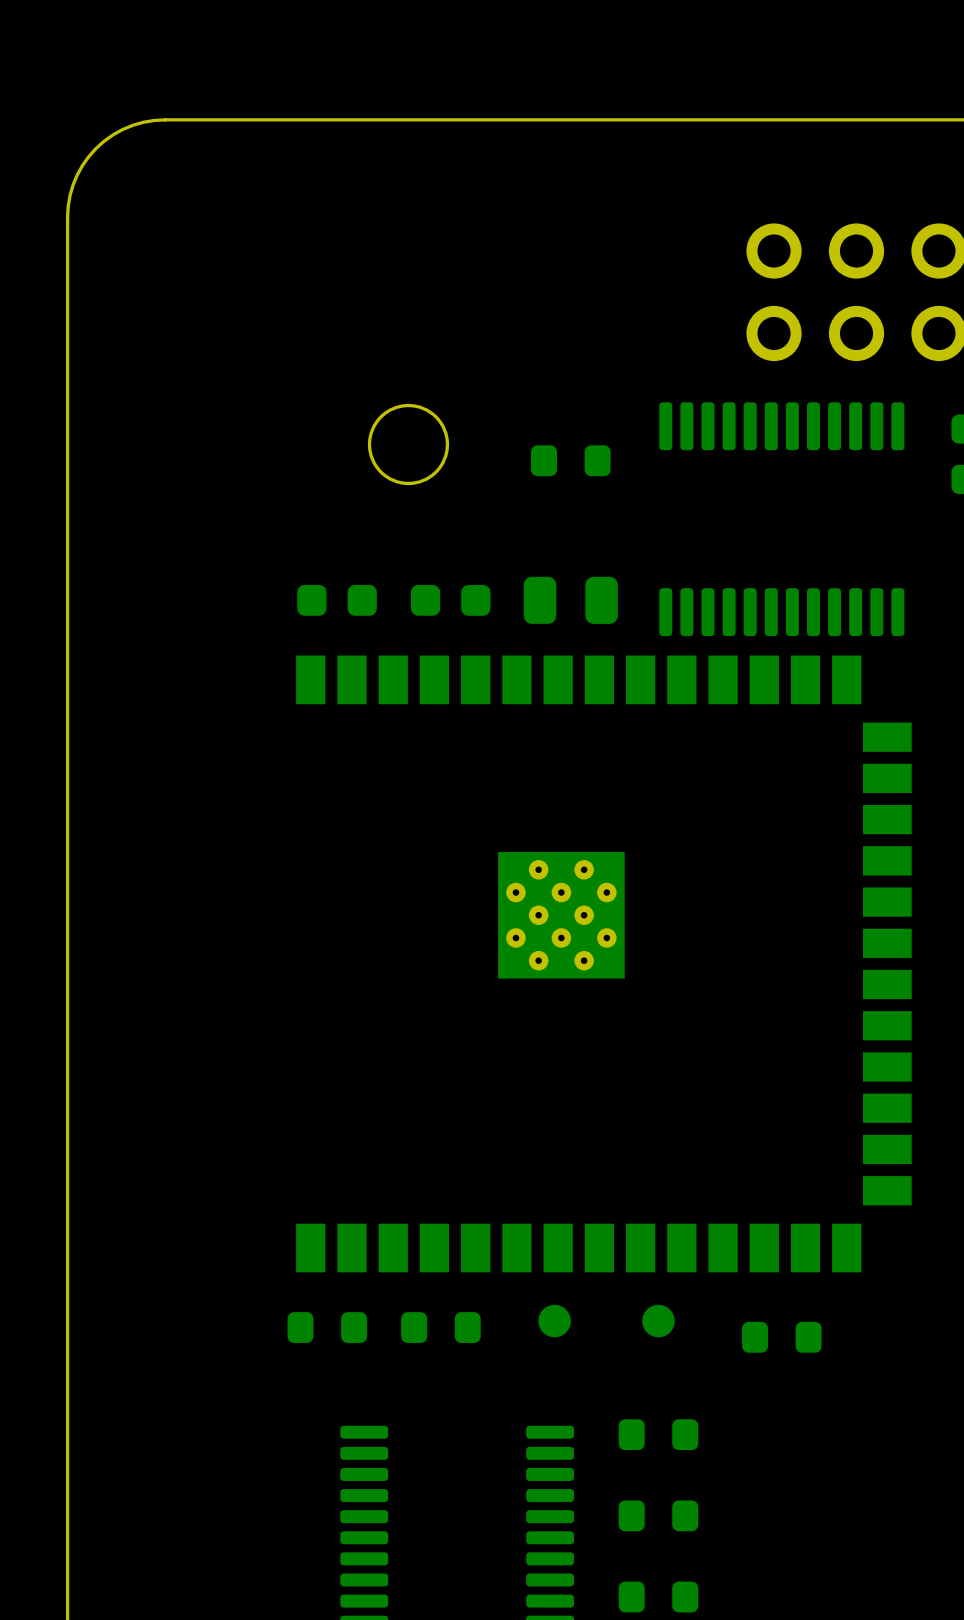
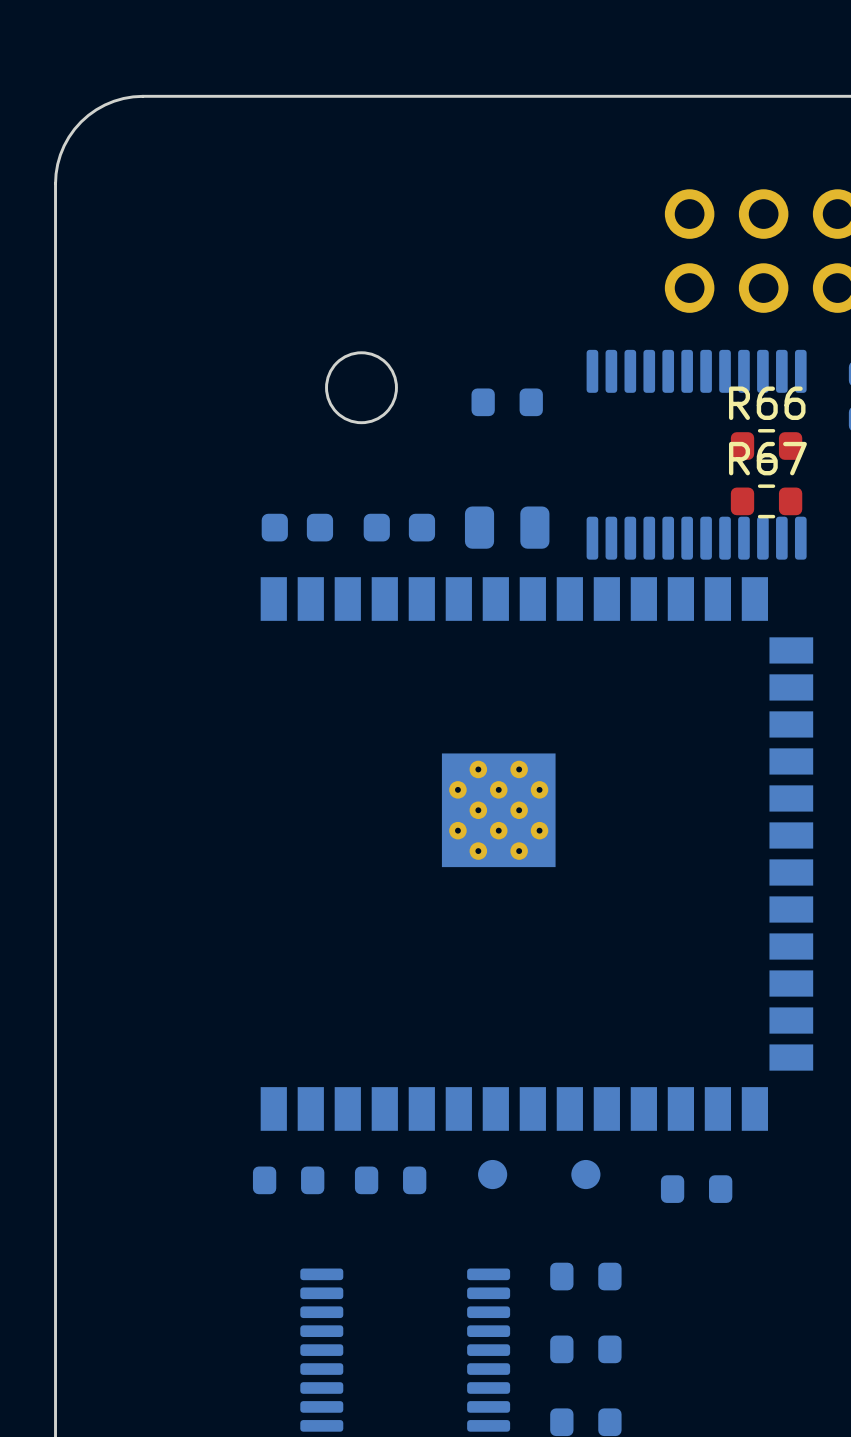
R66: none -> (766, 446)
R67: none -> (766, 501)

